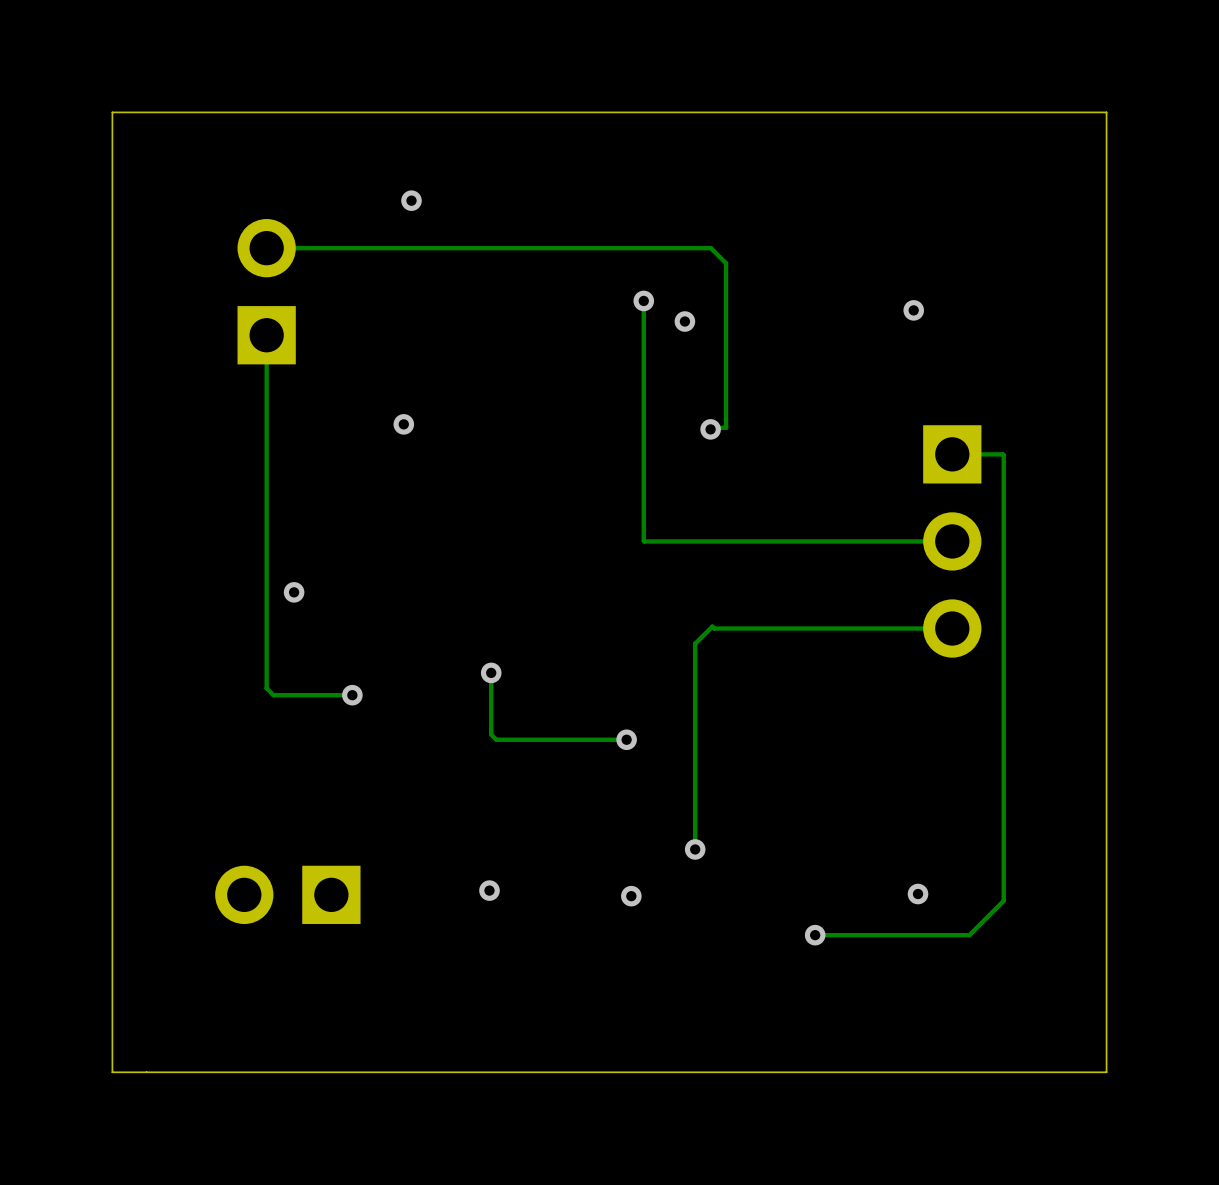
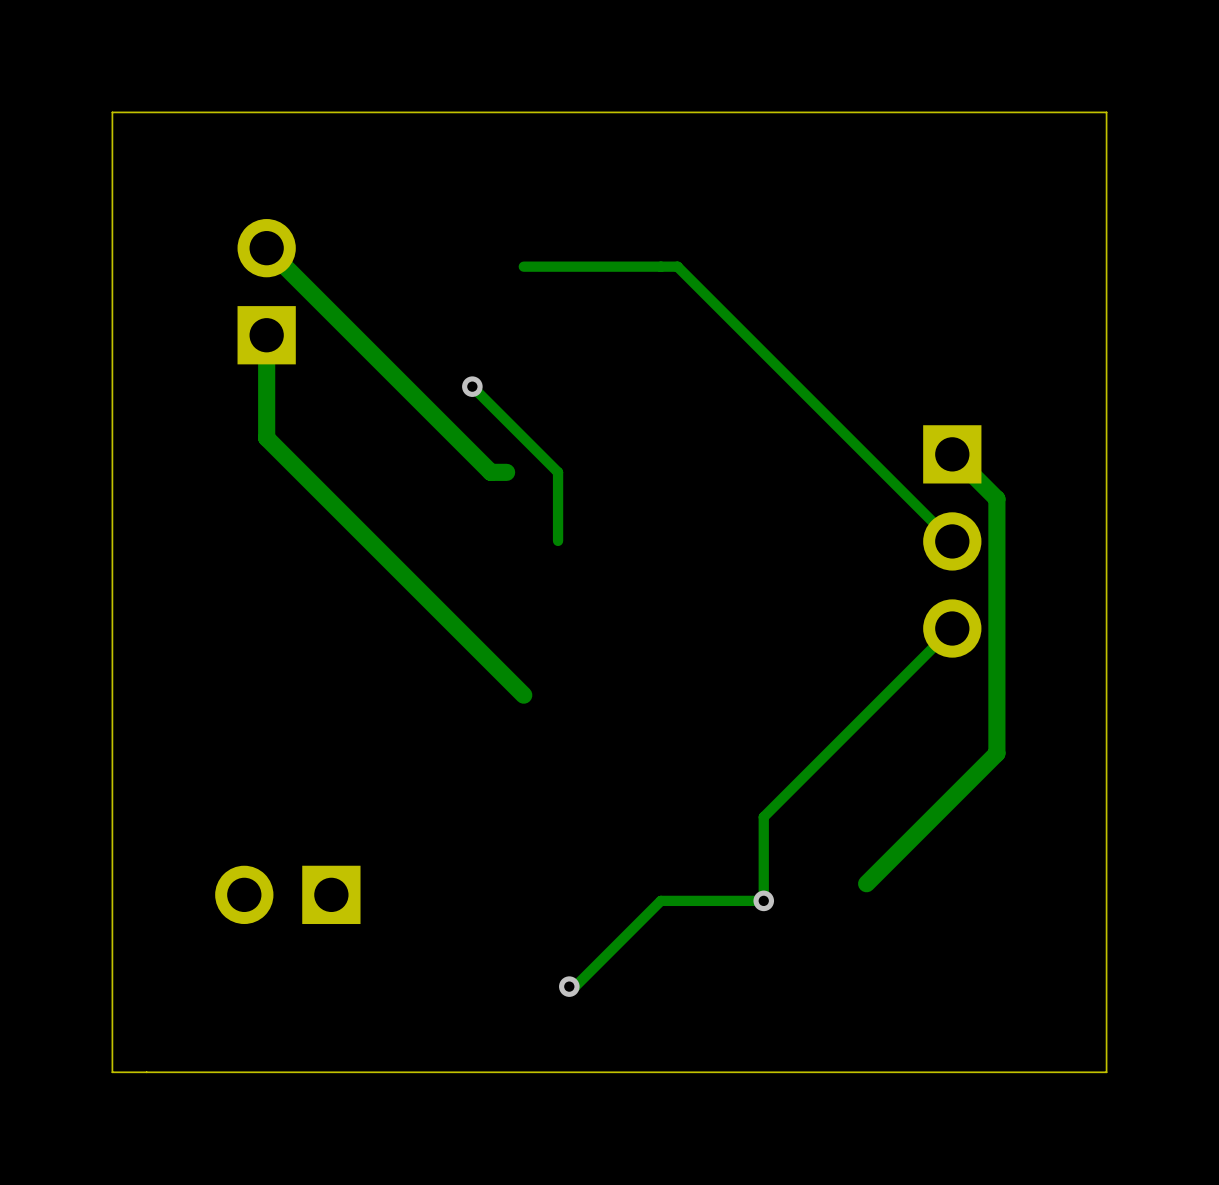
via: (411, 200) -> none
track: (266, 248) (710, 248) (726, 263) (726, 427) (710, 429) -> (266, 248) (490, 472) (506, 472)
track: (643, 300) (644, 541) (952, 541) -> (523, 266) (677, 266) (952, 541)
via: (643, 300) -> none
via: (913, 310) -> none
via: (684, 321) -> none
track width: thin (266, 335) (266, 438) -> thick (266, 335) (266, 438)
track: none -> (472, 386) (558, 472) (558, 540)
via position: (403, 424) -> (472, 386)
via: (710, 429) -> none
track: (266, 438) (266, 688) (273, 695) (352, 695) -> (266, 438) (523, 695)
track: (952, 454) (1003, 455) (1003, 900) (969, 935) (815, 935) -> (952, 454) (996, 498) (996, 753) (866, 883)
via: (294, 592) -> none
track: (952, 628) (714, 628) (712, 626) (695, 643) (695, 849) -> (952, 628) (763, 817) (763, 900) (660, 900) (575, 986) (569, 986)
track: (491, 672) (491, 734) (496, 739) (626, 739) -> none
via: (491, 672) -> none
via: (352, 695) -> none
via: (626, 739) -> none
via: (695, 849) -> none
via: (489, 890) -> none
via: (918, 894) -> none
via: (631, 896) -> none
via: none -> (763, 900)
via: (815, 935) -> none
via: none -> (569, 986)

